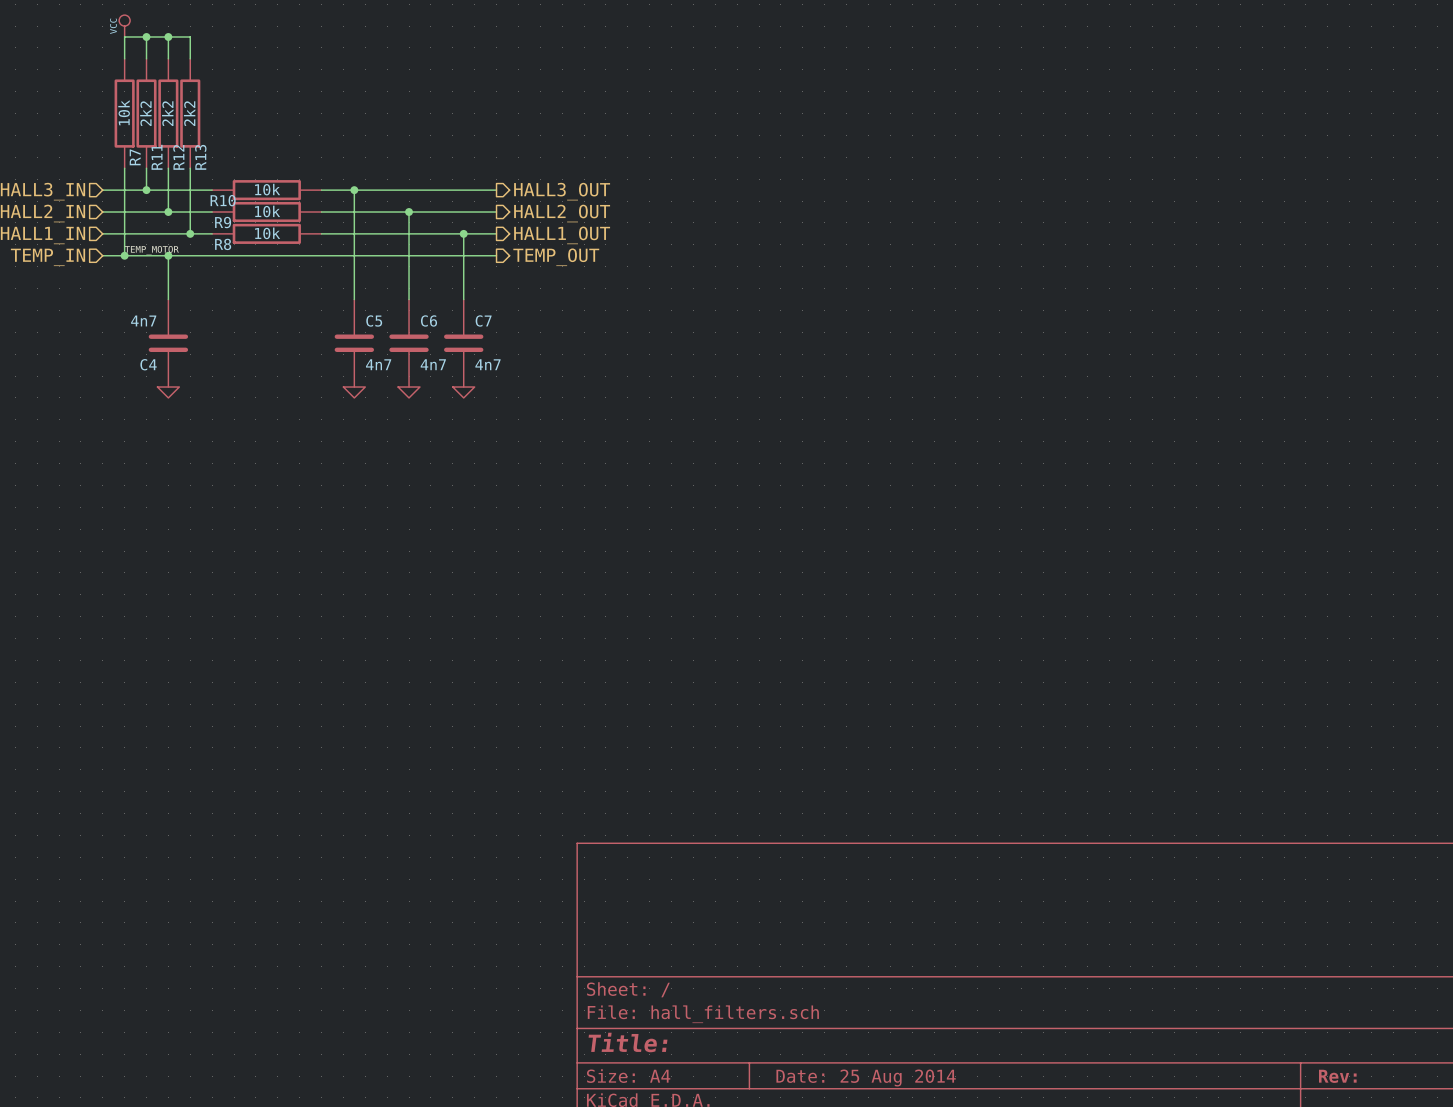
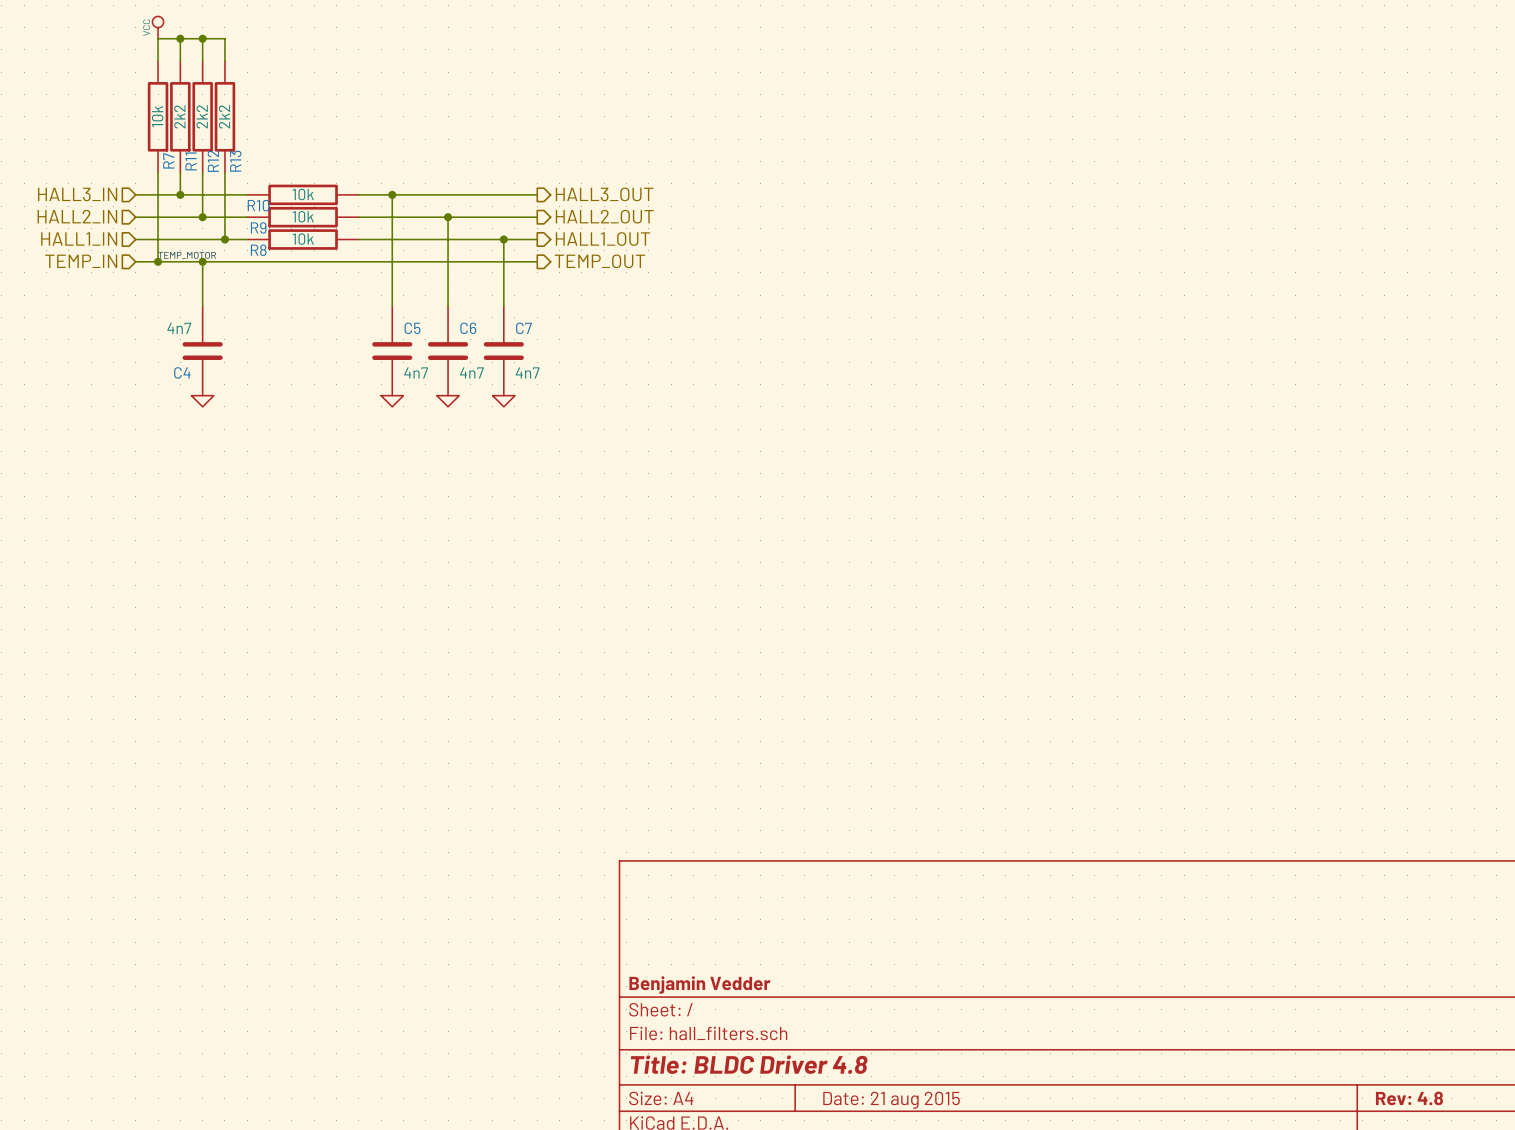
title block: none -> Benjamin Vedder (699, 985)
title block: Title: (628, 1042) -> Title: BLDC Driver 4.8 (749, 1064)
title block: Rev: (1337, 1076) -> Rev: 4.8 (1409, 1098)
title block: Date: 25 Aug 2014 (866, 1077) -> Date: 21 aug 2015 (891, 1100)

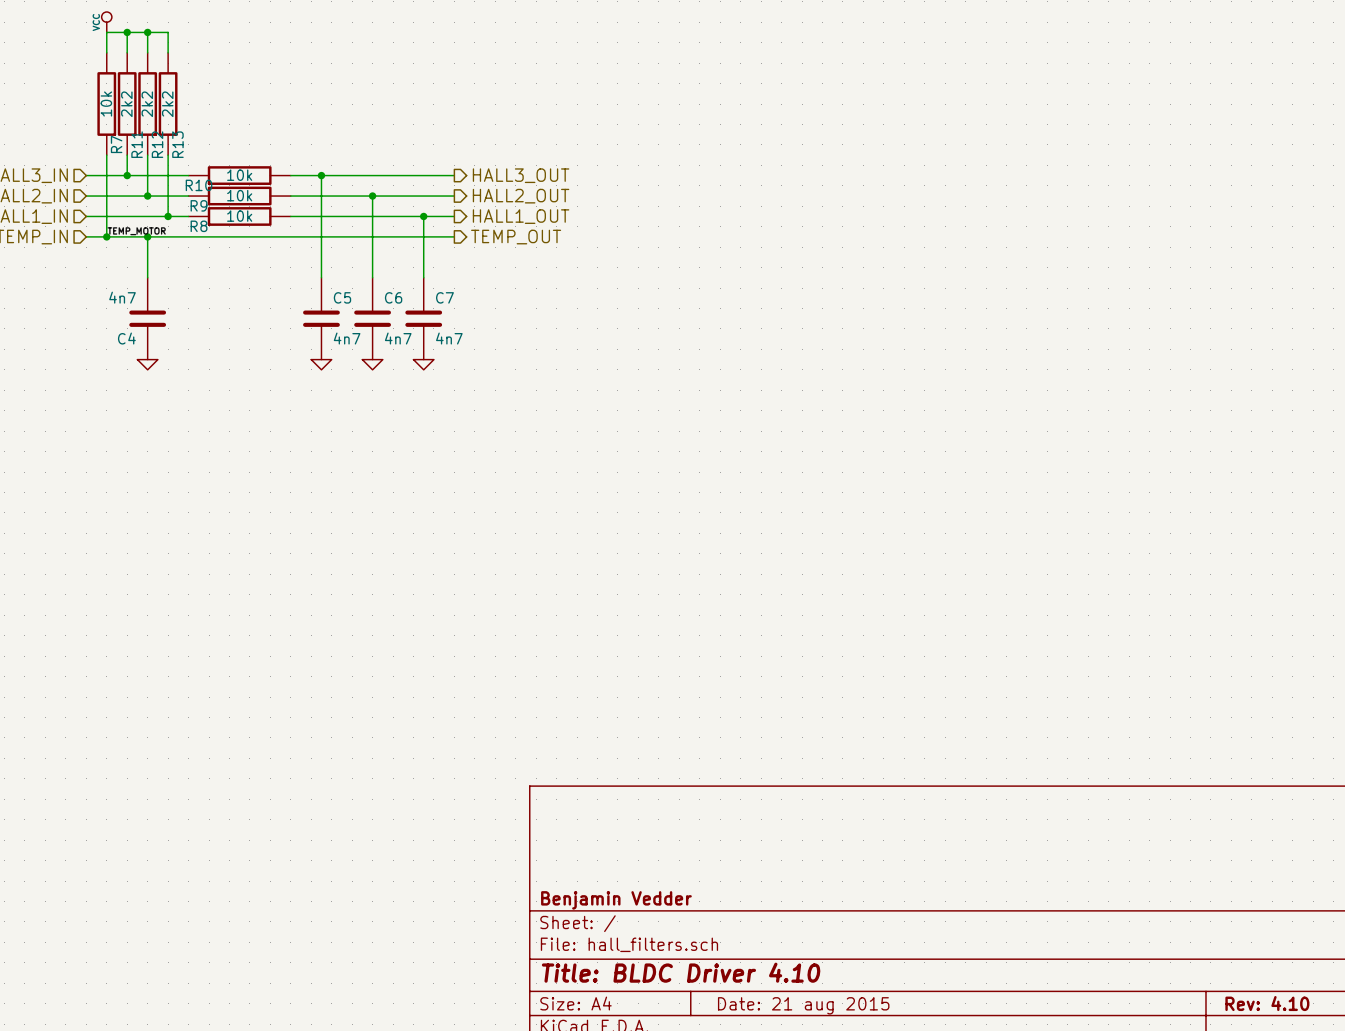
title block: Title: BLDC Driver 4.8 (749, 1064) -> Title: BLDC Driver 4.10 (681, 972)
title block: Rev: 4.8 (1409, 1098) -> Rev: 4.10 (1267, 1003)

